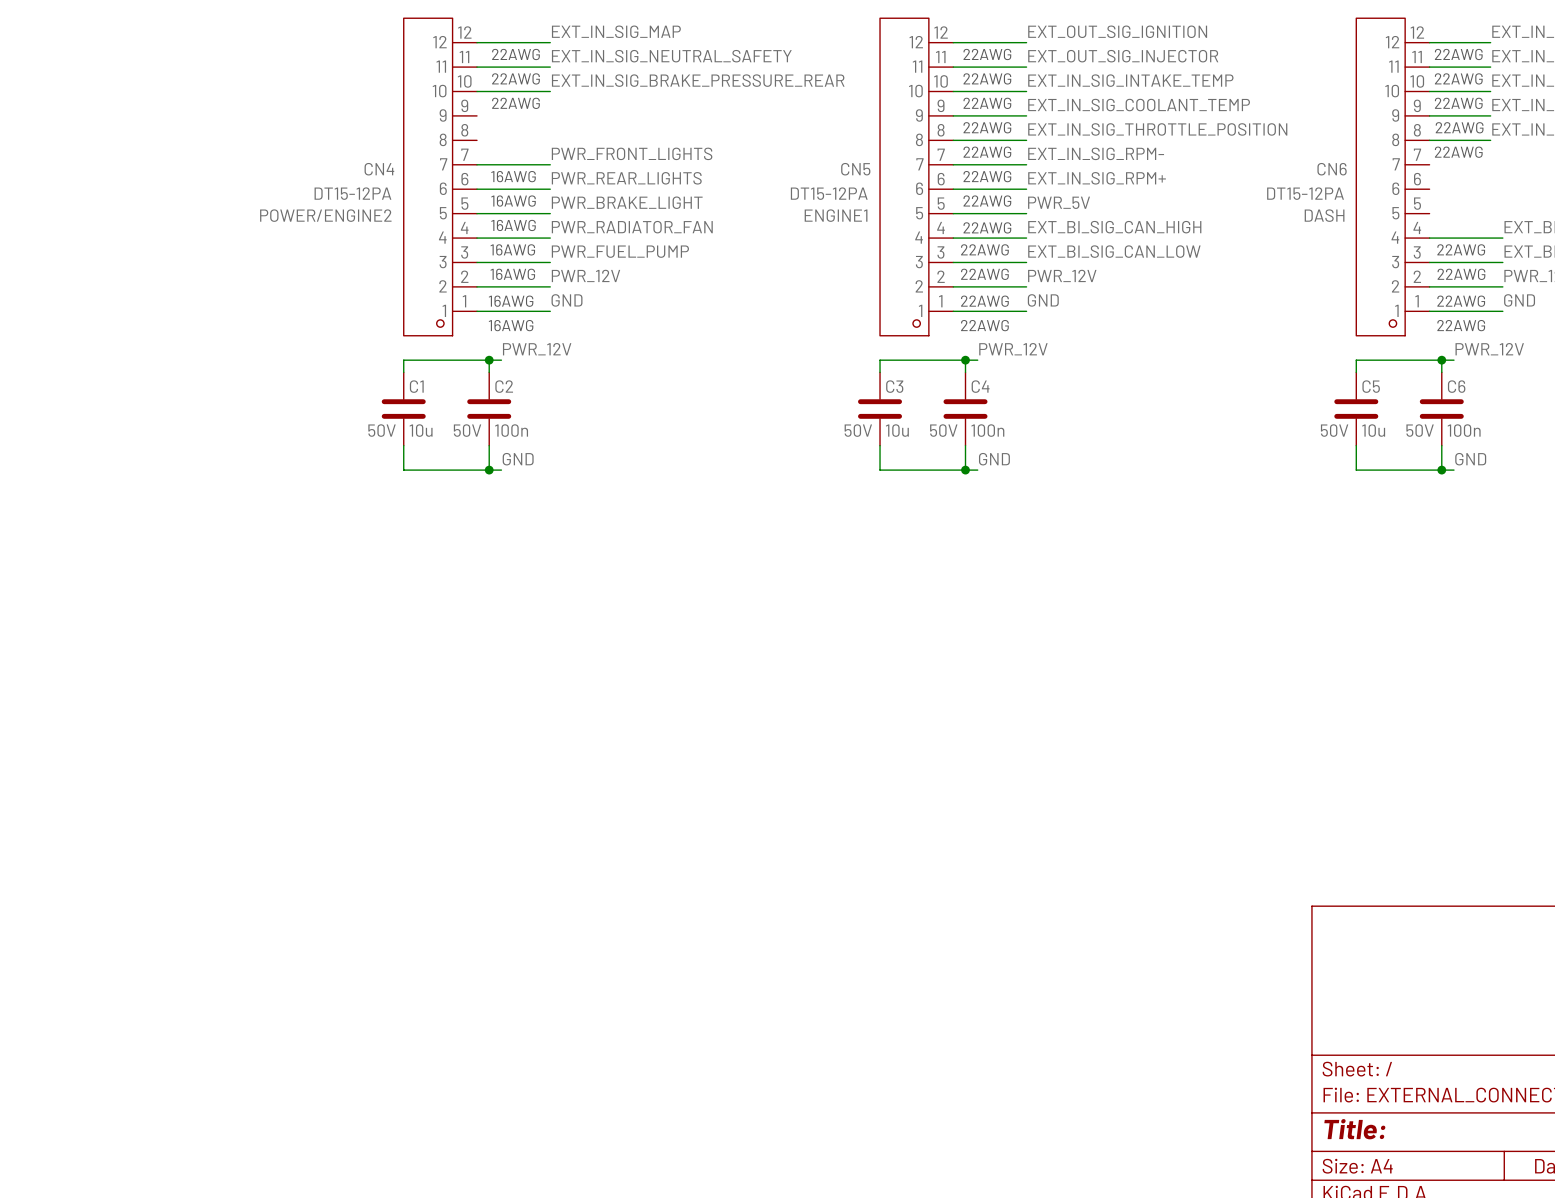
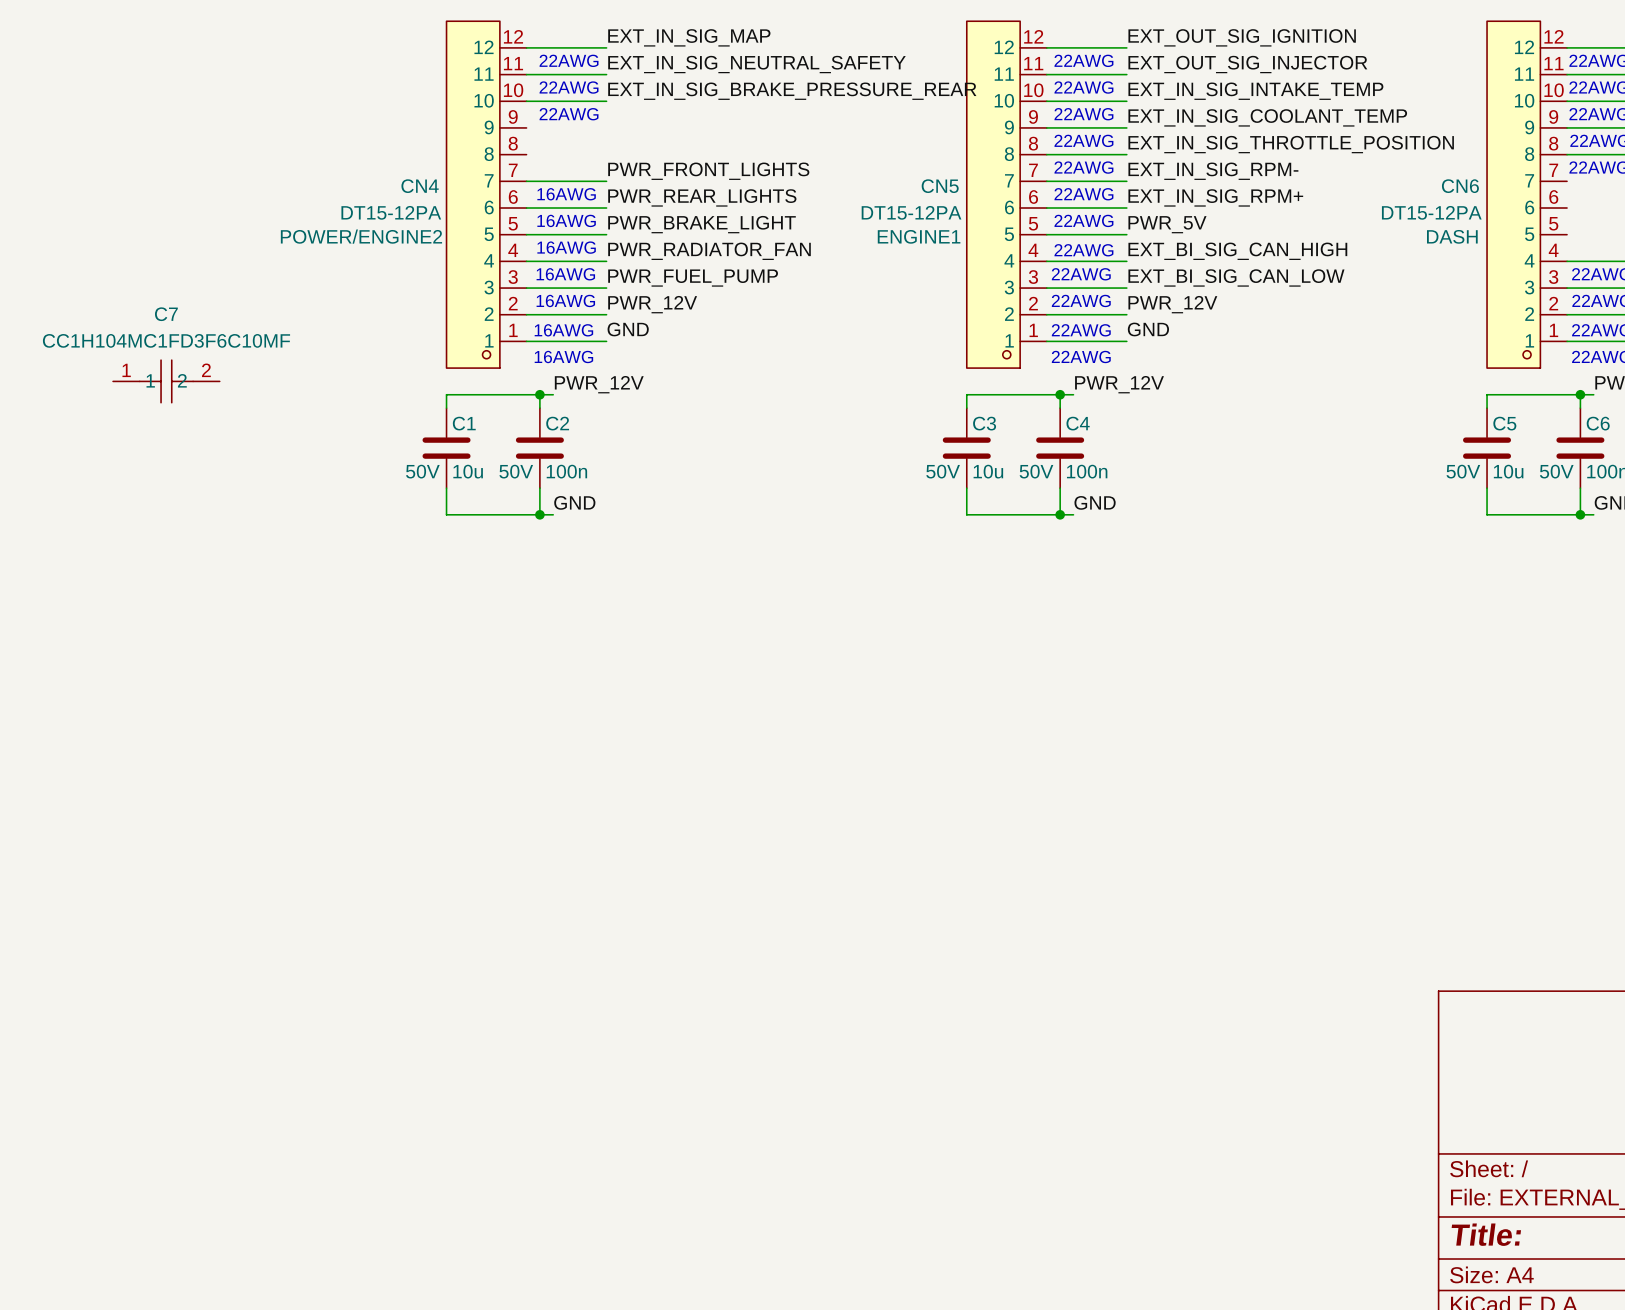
C7: none -> CC1H104MC1FD3F6C10MF (166, 381)

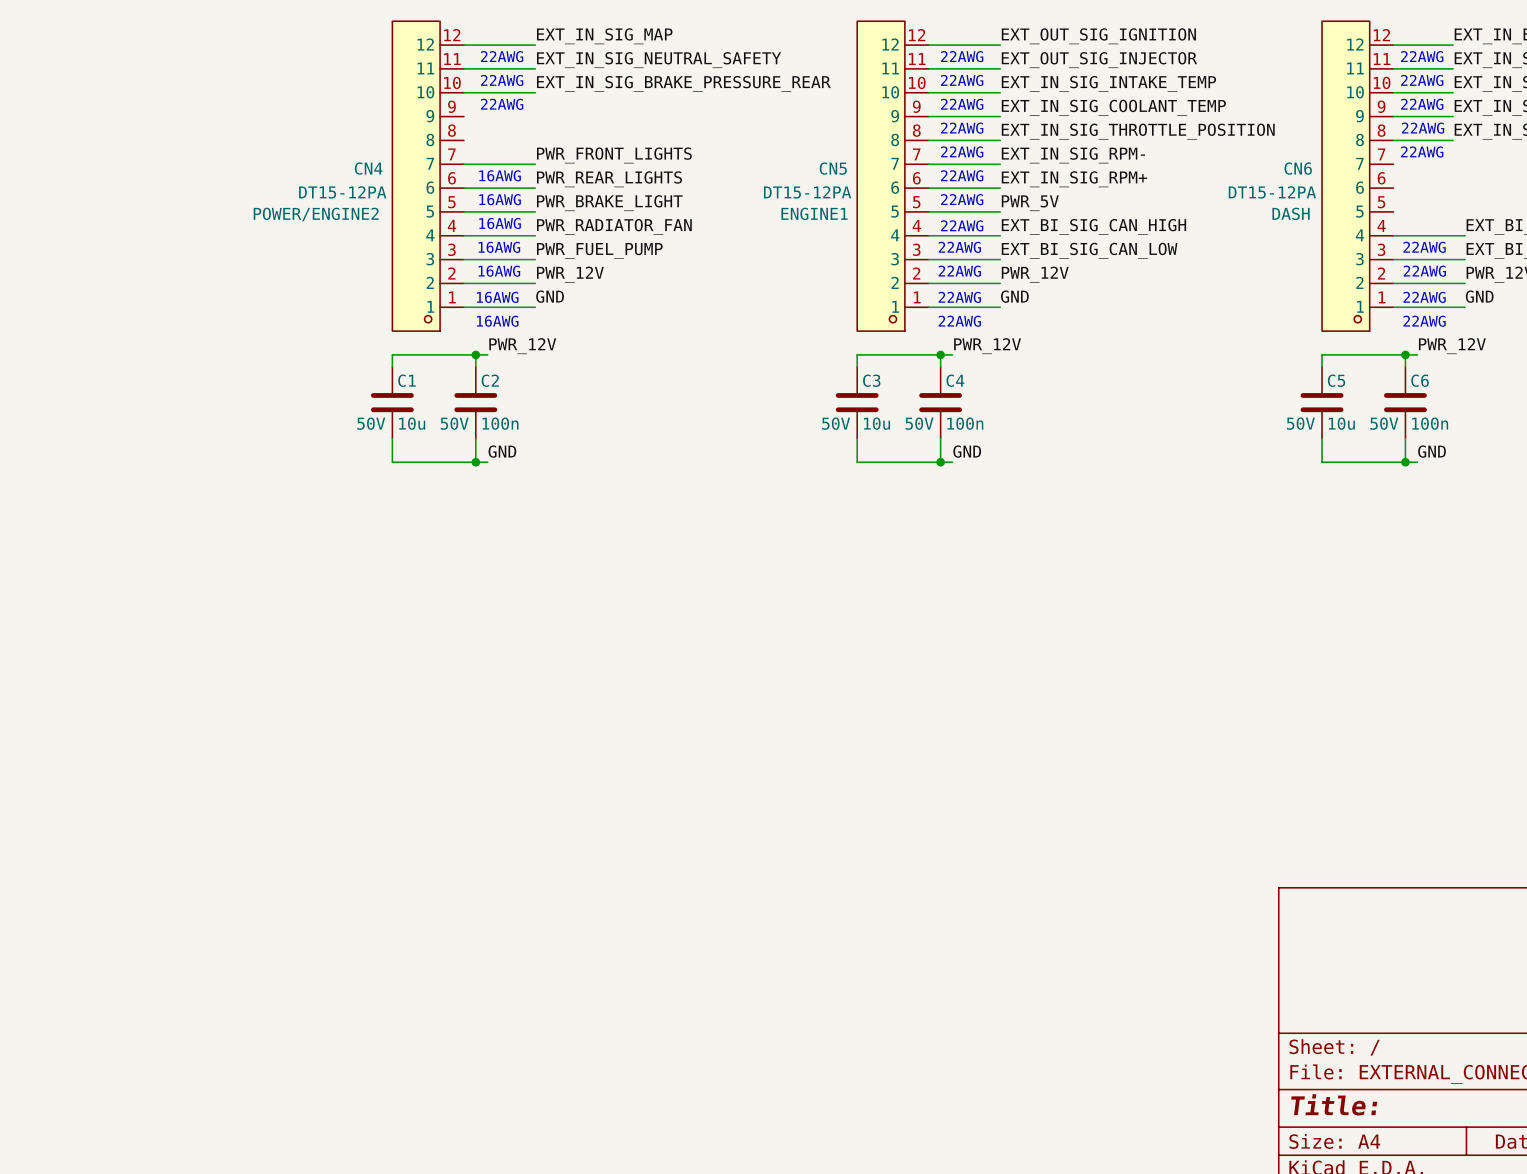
C7: CC1H104MC1FD3F6C10MF (166, 381) -> none

